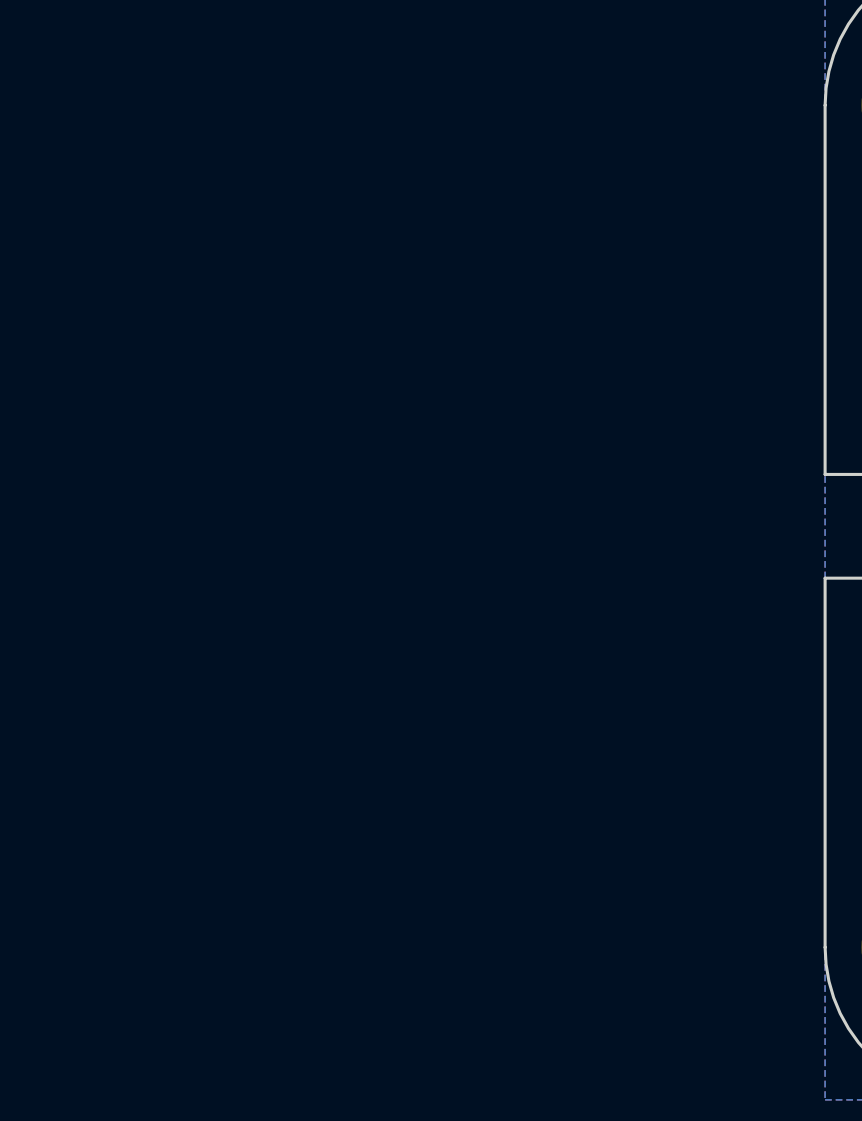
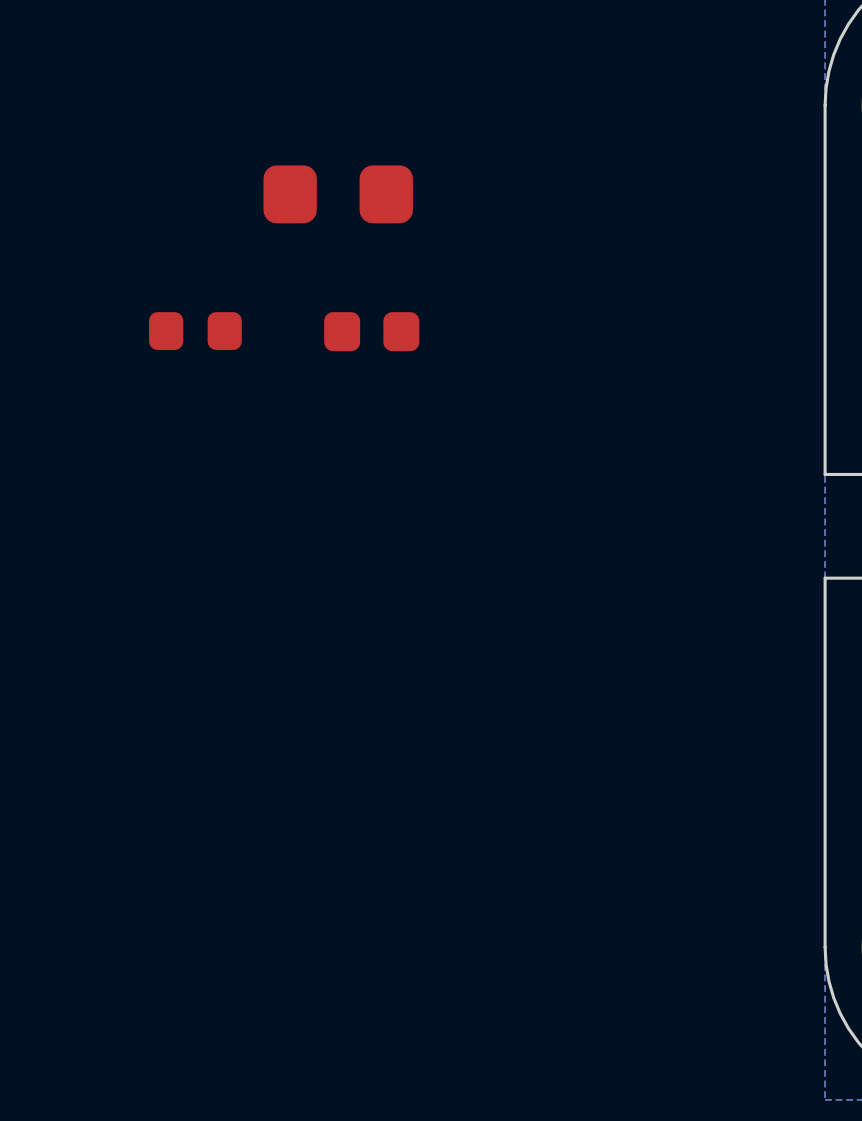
part: none -> (338, 194)
part: none -> (195, 331)
part: none -> (371, 331)

